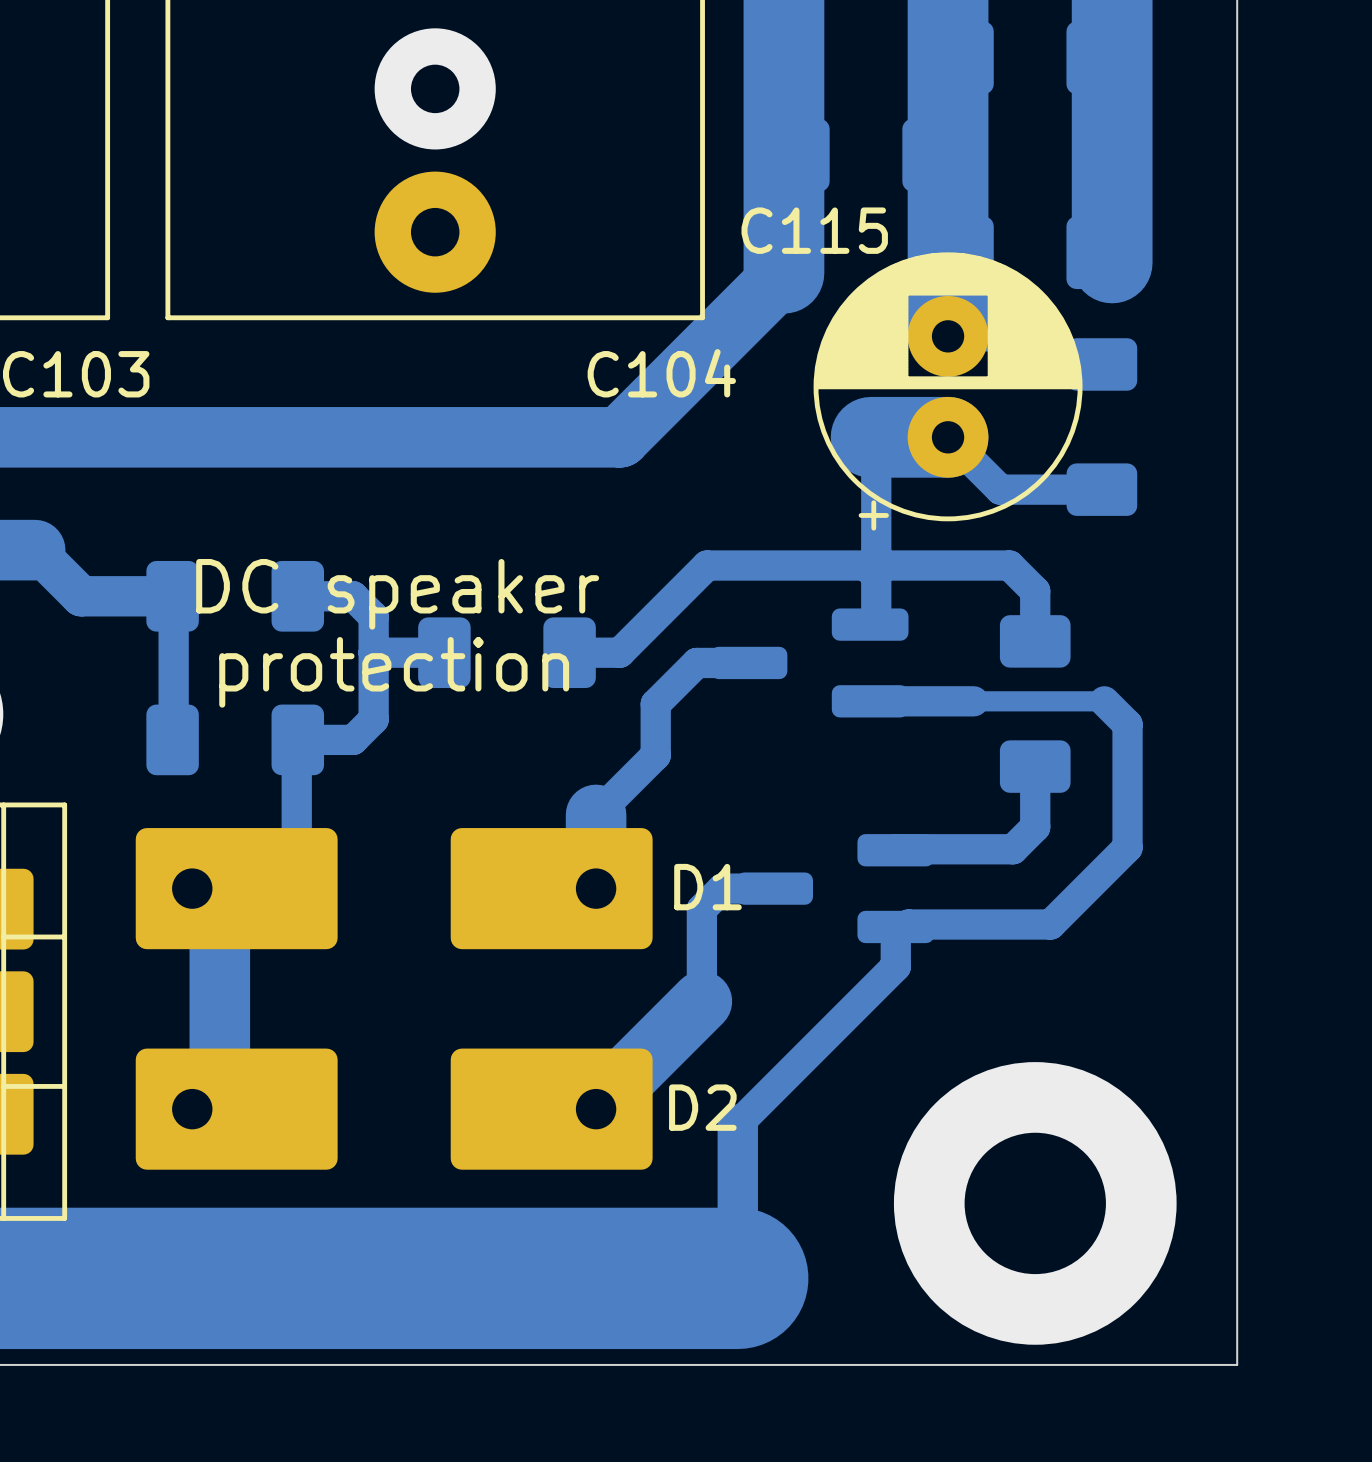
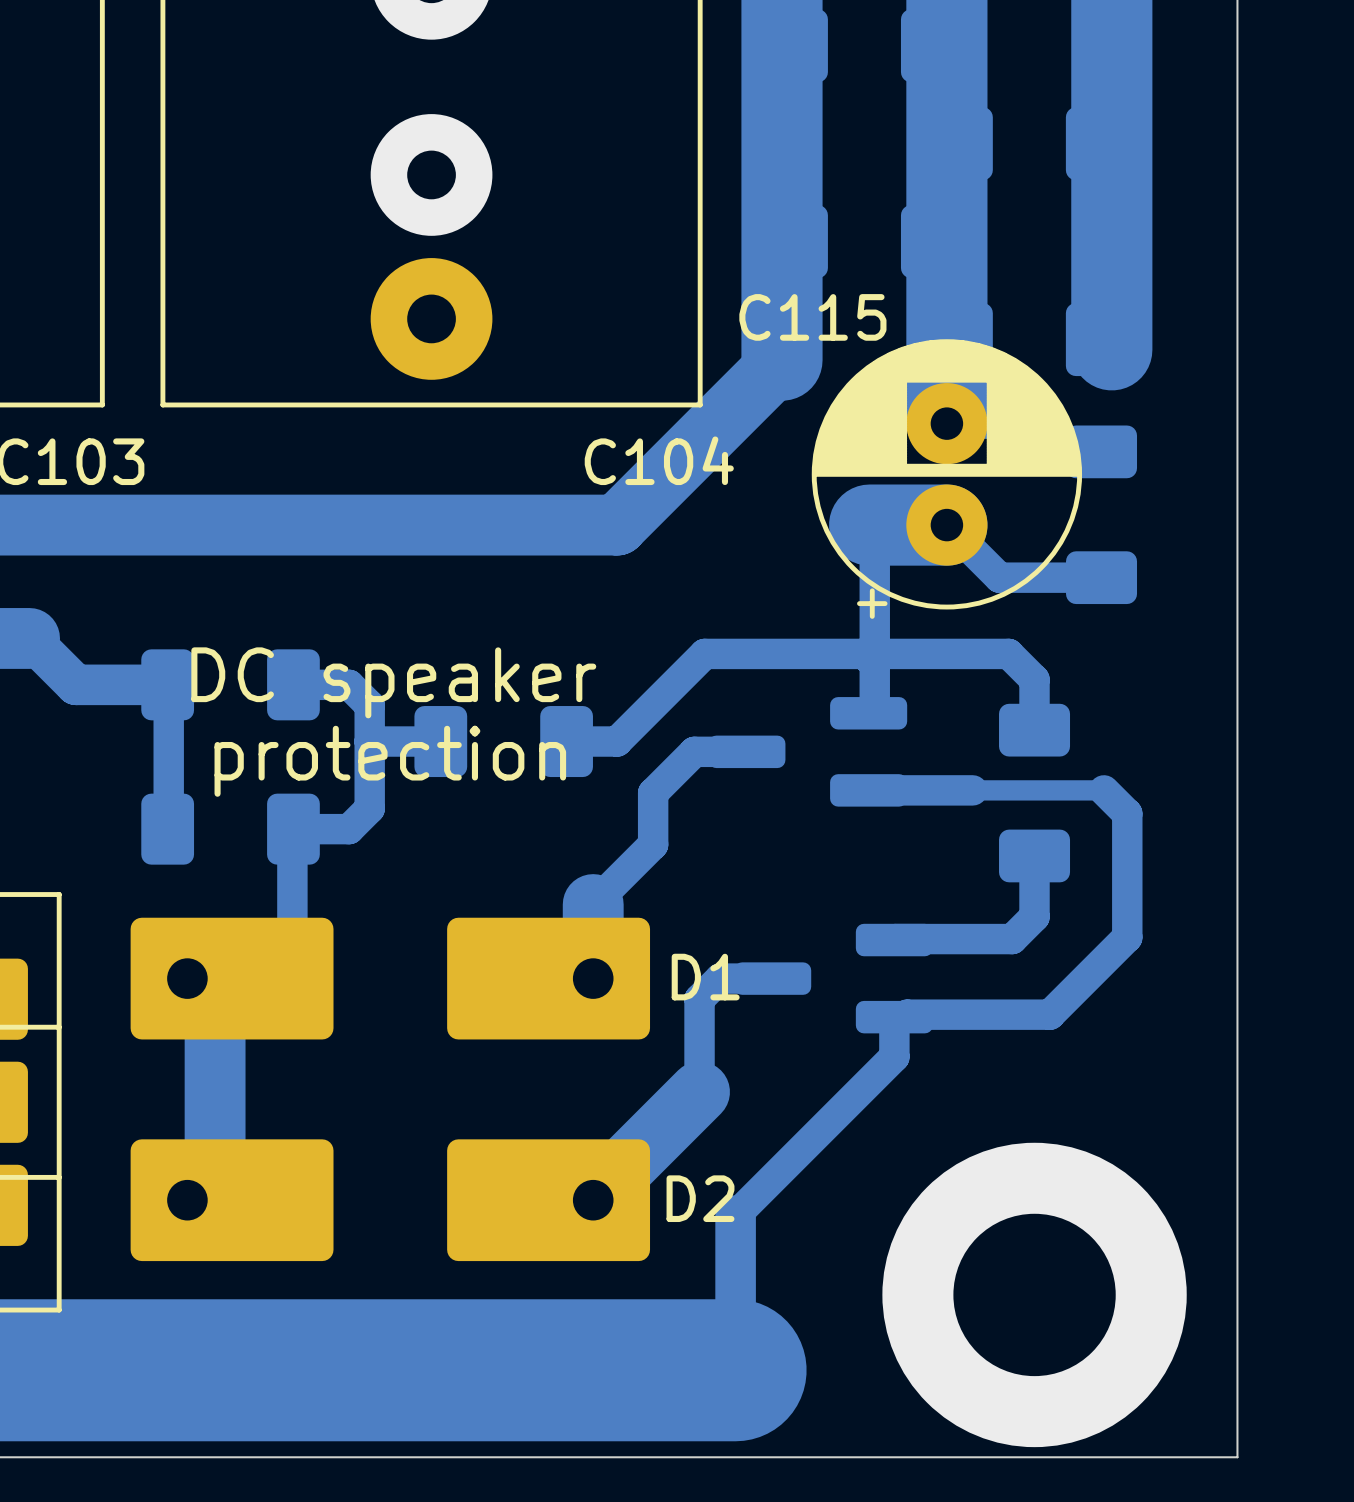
via size: [893, 1062, 1177, 1345] -> [882, 1142, 1187, 1448]

